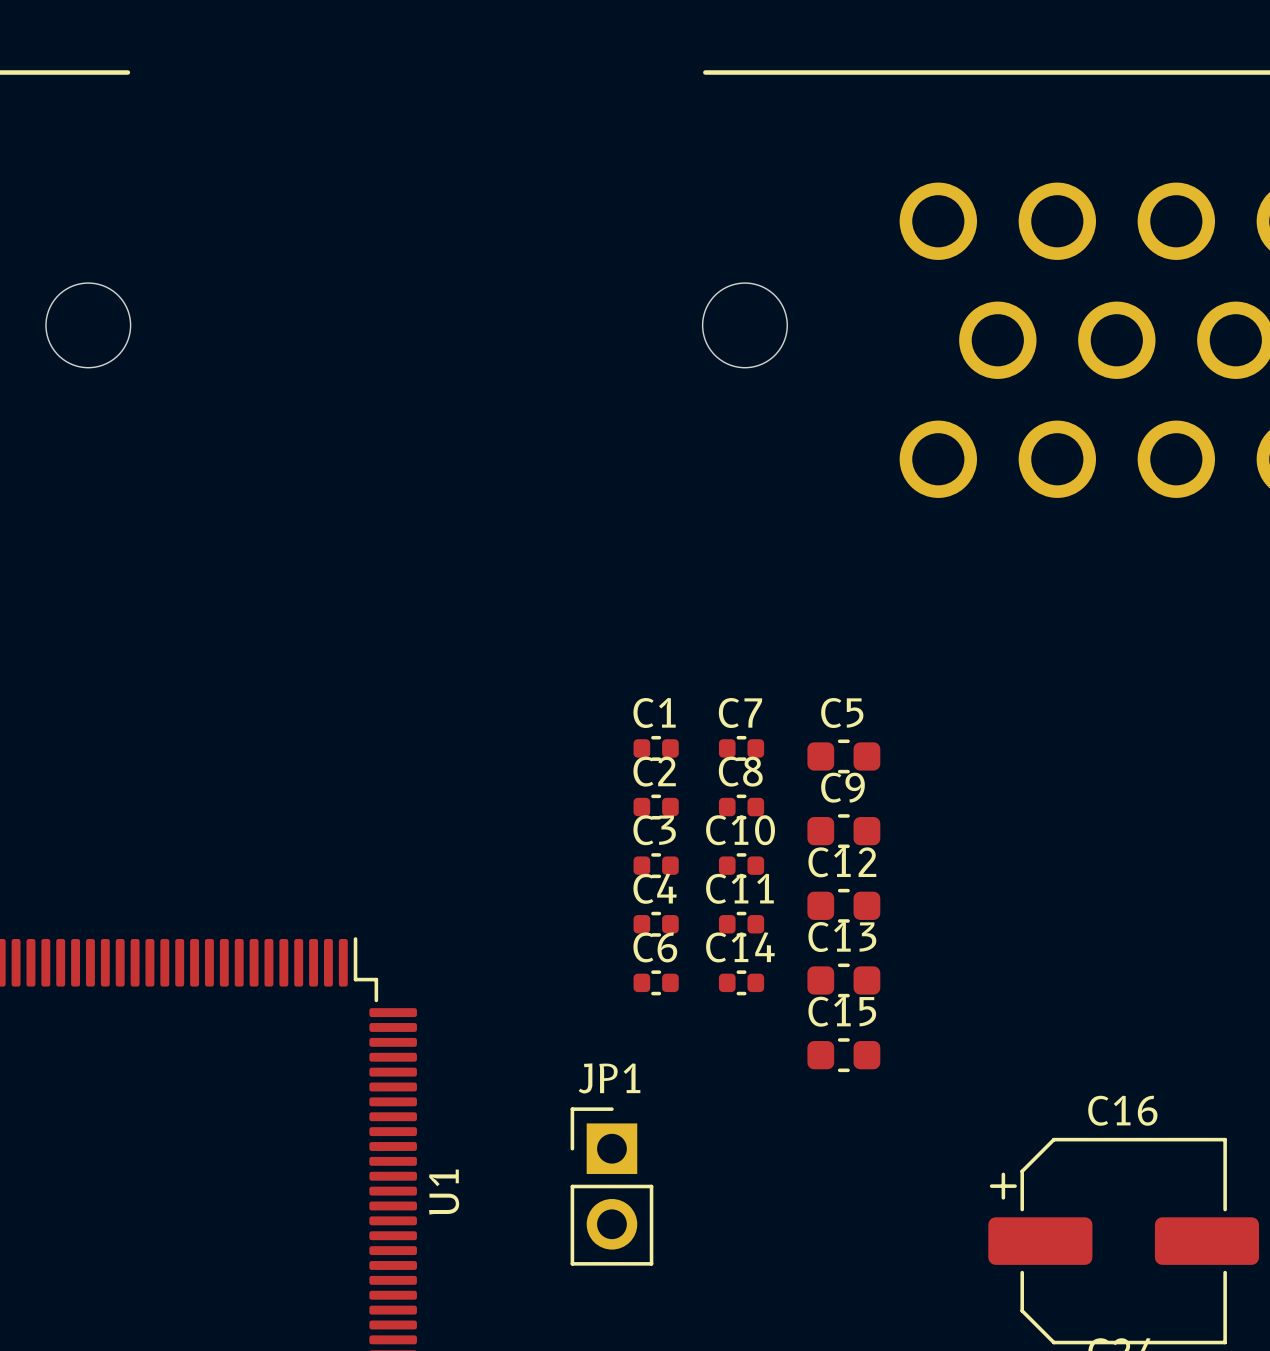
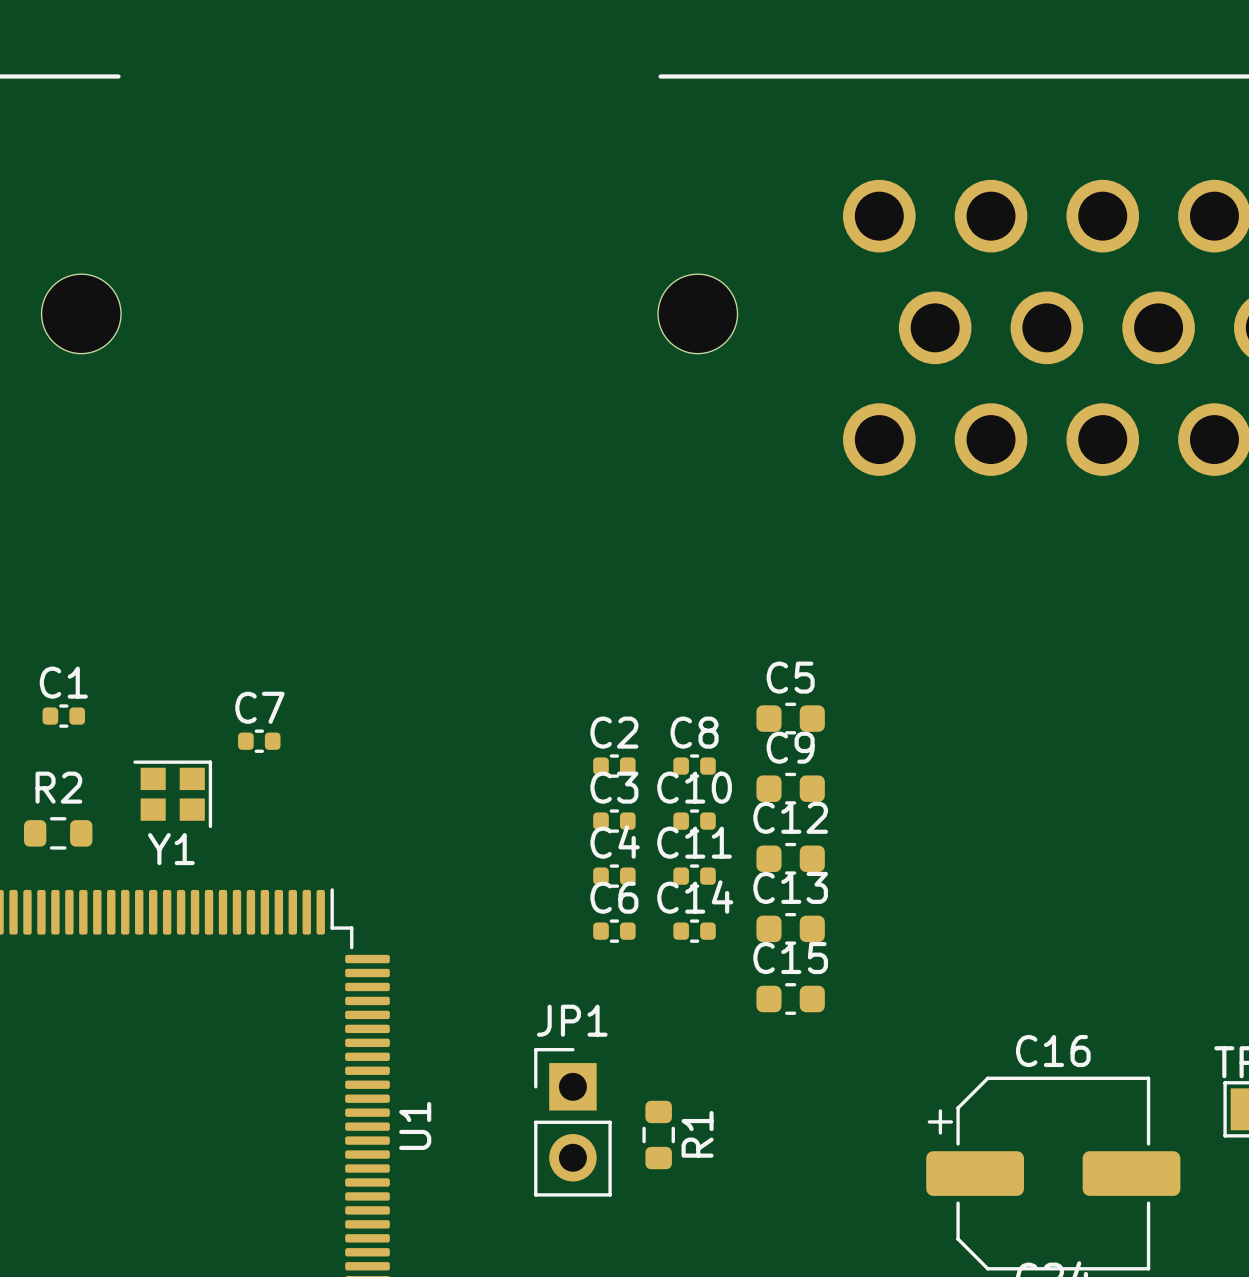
C1 position: (656, 748) -> (63, 716)
C7 position: (741, 748) -> (259, 741)
Y1: none -> (172, 794)
R2: none -> (58, 833)
R1: none -> (658, 1135)

